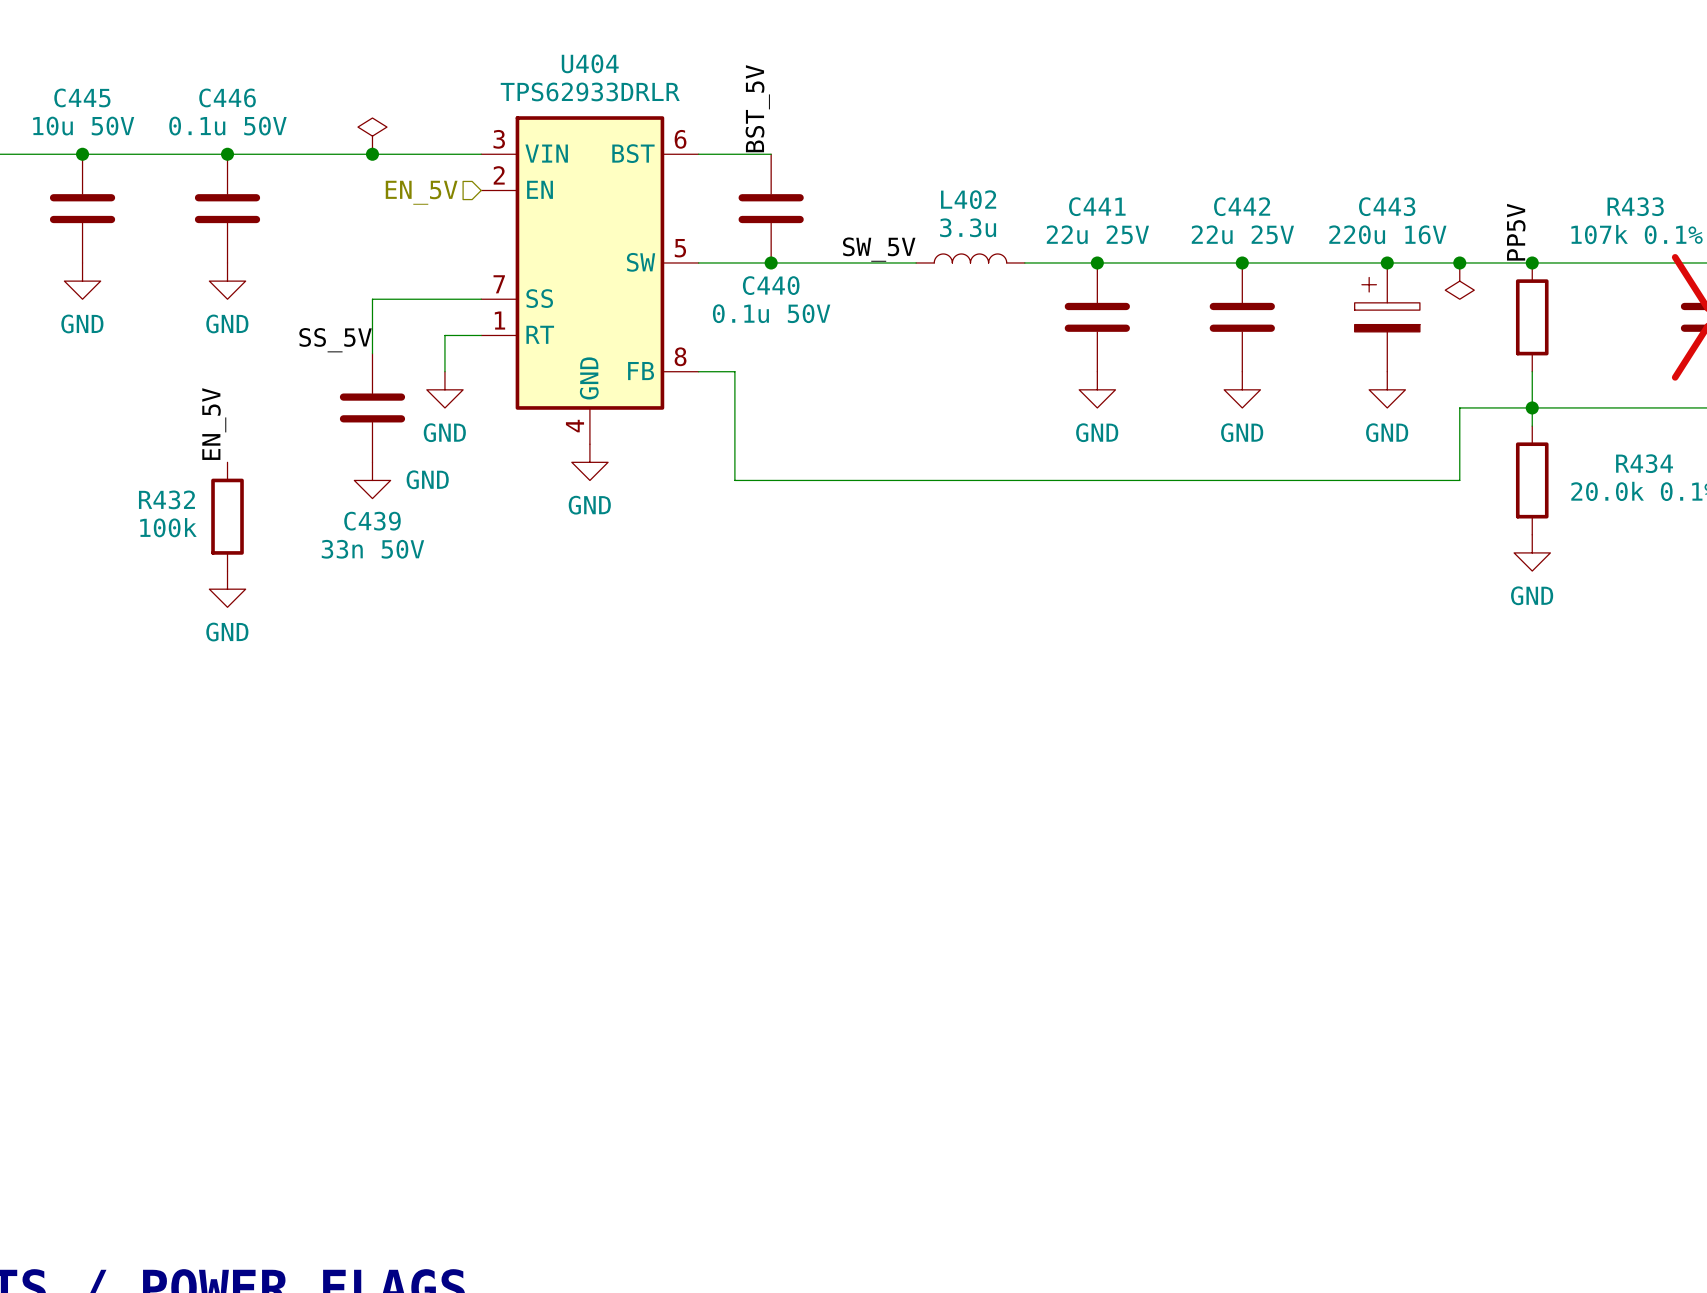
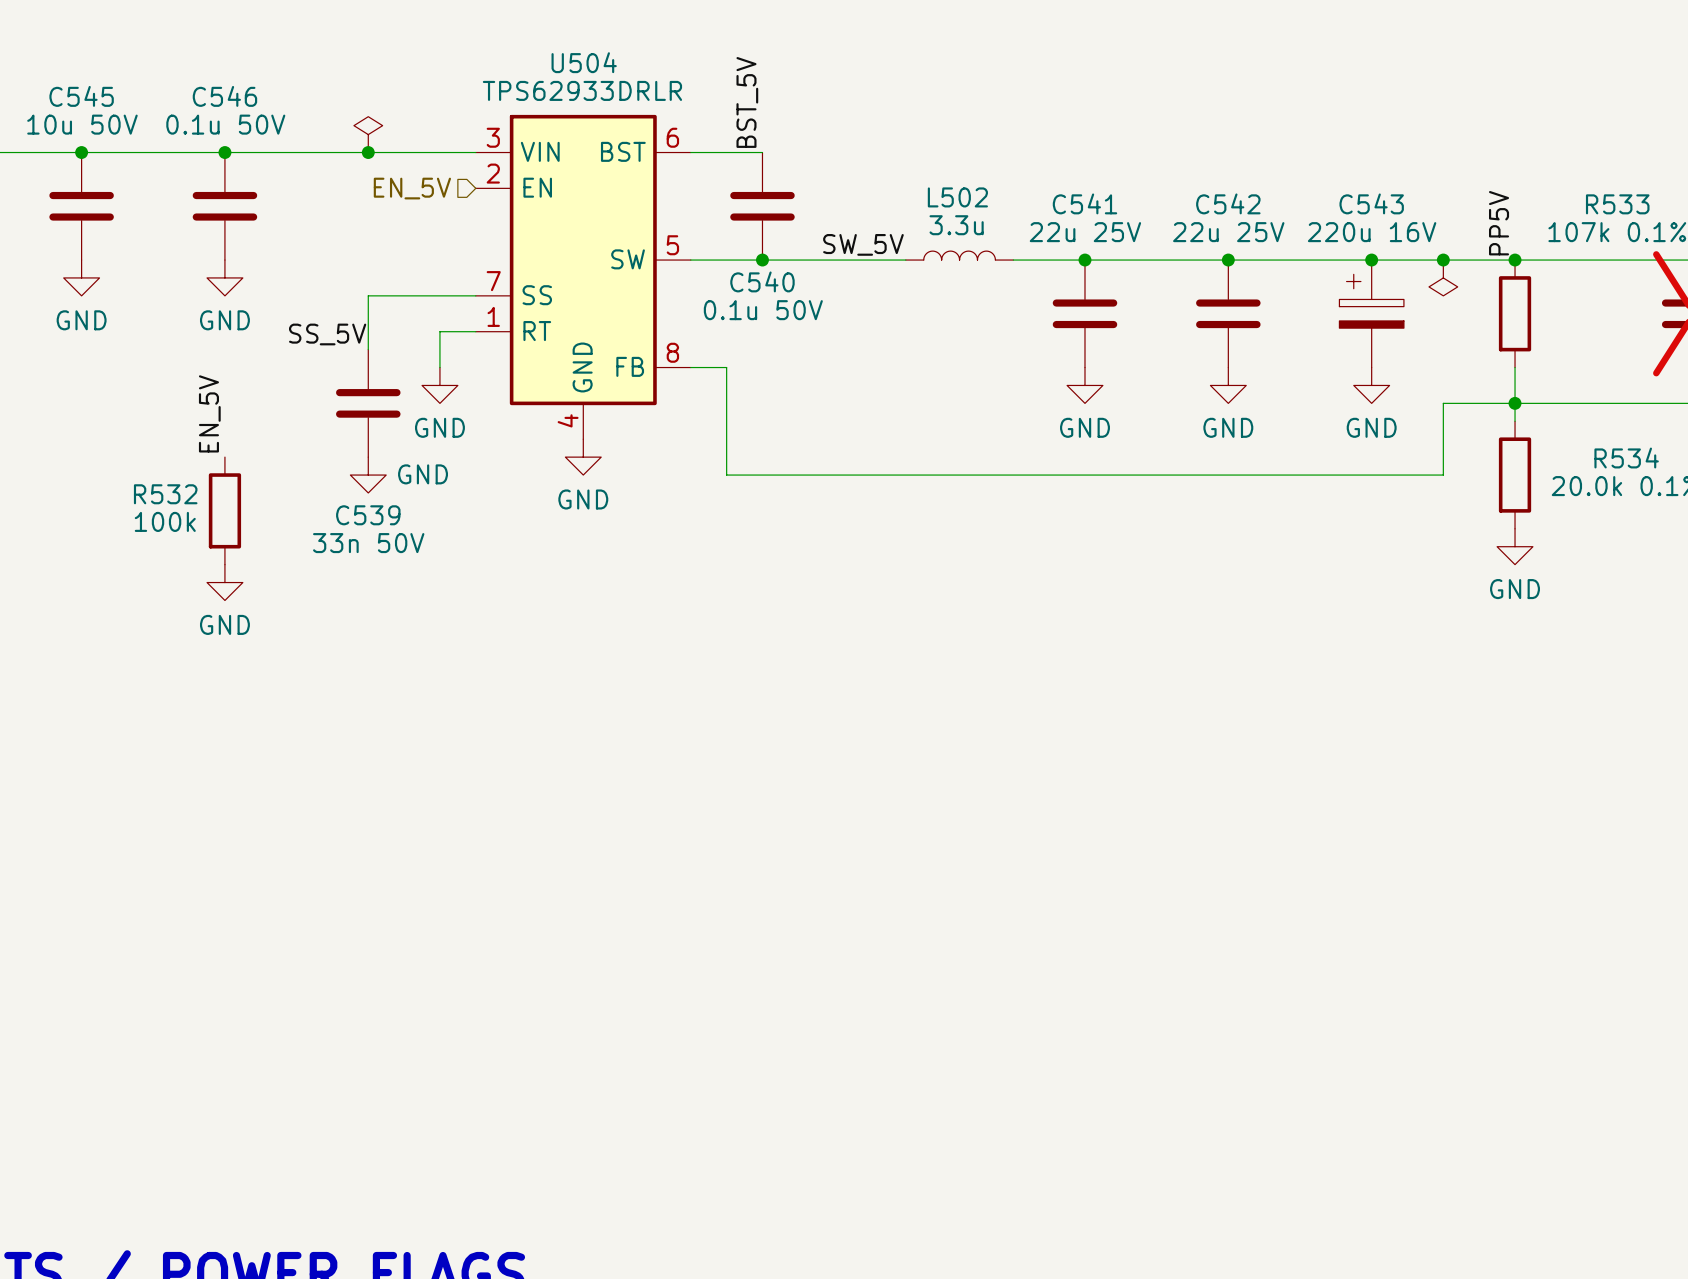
U404 name: U404 (590, 63) -> U504 (584, 62)
C445 name: C445 (82, 97) -> C545 (81, 96)
C446 name: C446 (227, 97) -> C546 (224, 96)
L402 name: L402 (968, 199) -> L502 (957, 197)
C441 name: C441 (1097, 206) -> C541 (1084, 203)
C442 name: C442 (1242, 206) -> C542 (1228, 203)
C443 name: C443 (1387, 206) -> C543 (1371, 203)
R433 name: R433 (1635, 206) -> R533 (1617, 204)
C440 name: C440 (771, 285) -> C540 (762, 281)
R434 name: R434 (1644, 463) -> R534 (1626, 458)
R432 name: R432 (166, 499) -> R532 (165, 494)
C439 name: C439 (372, 521) -> C539 (368, 515)

